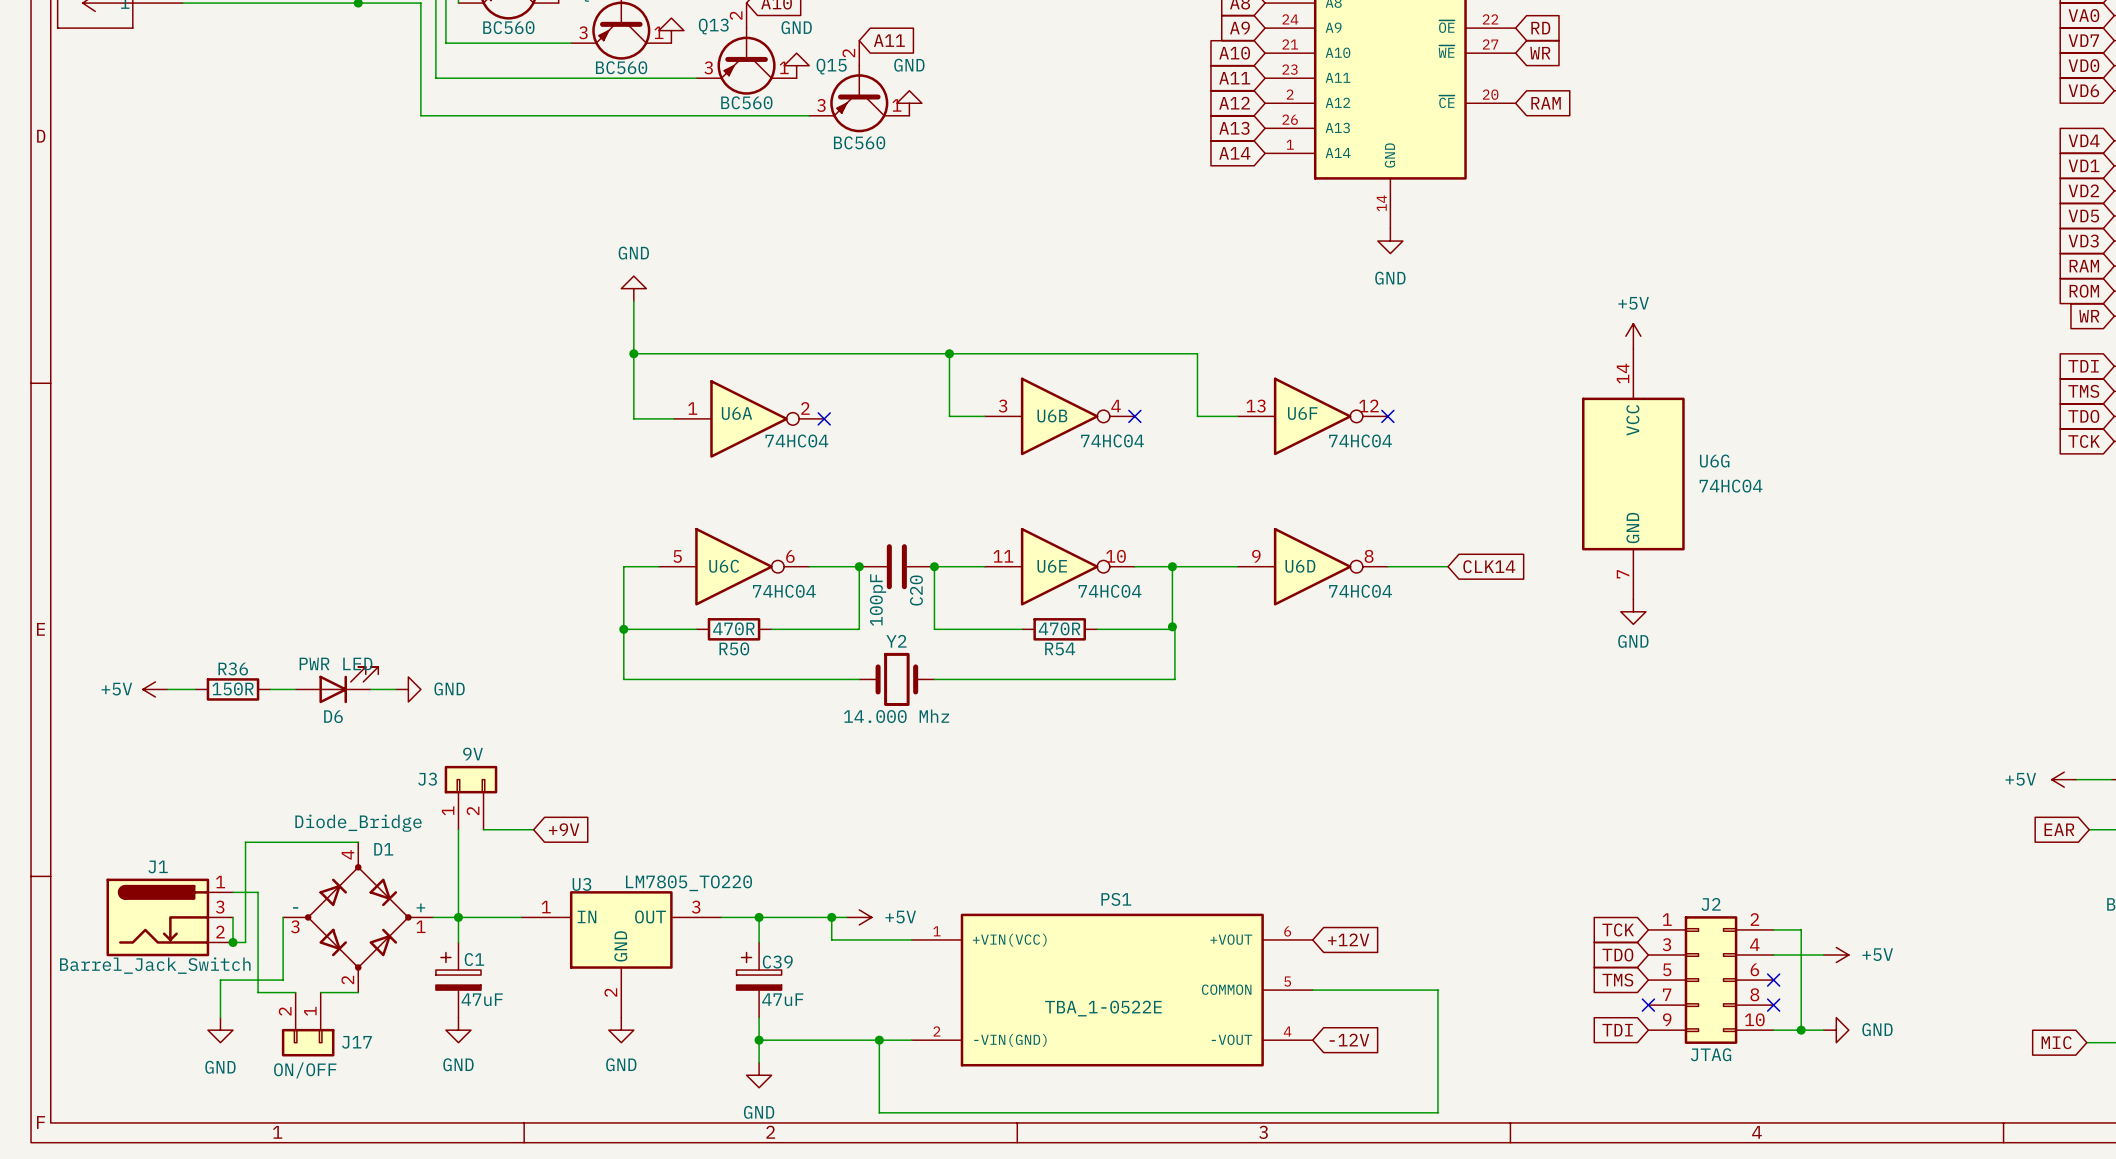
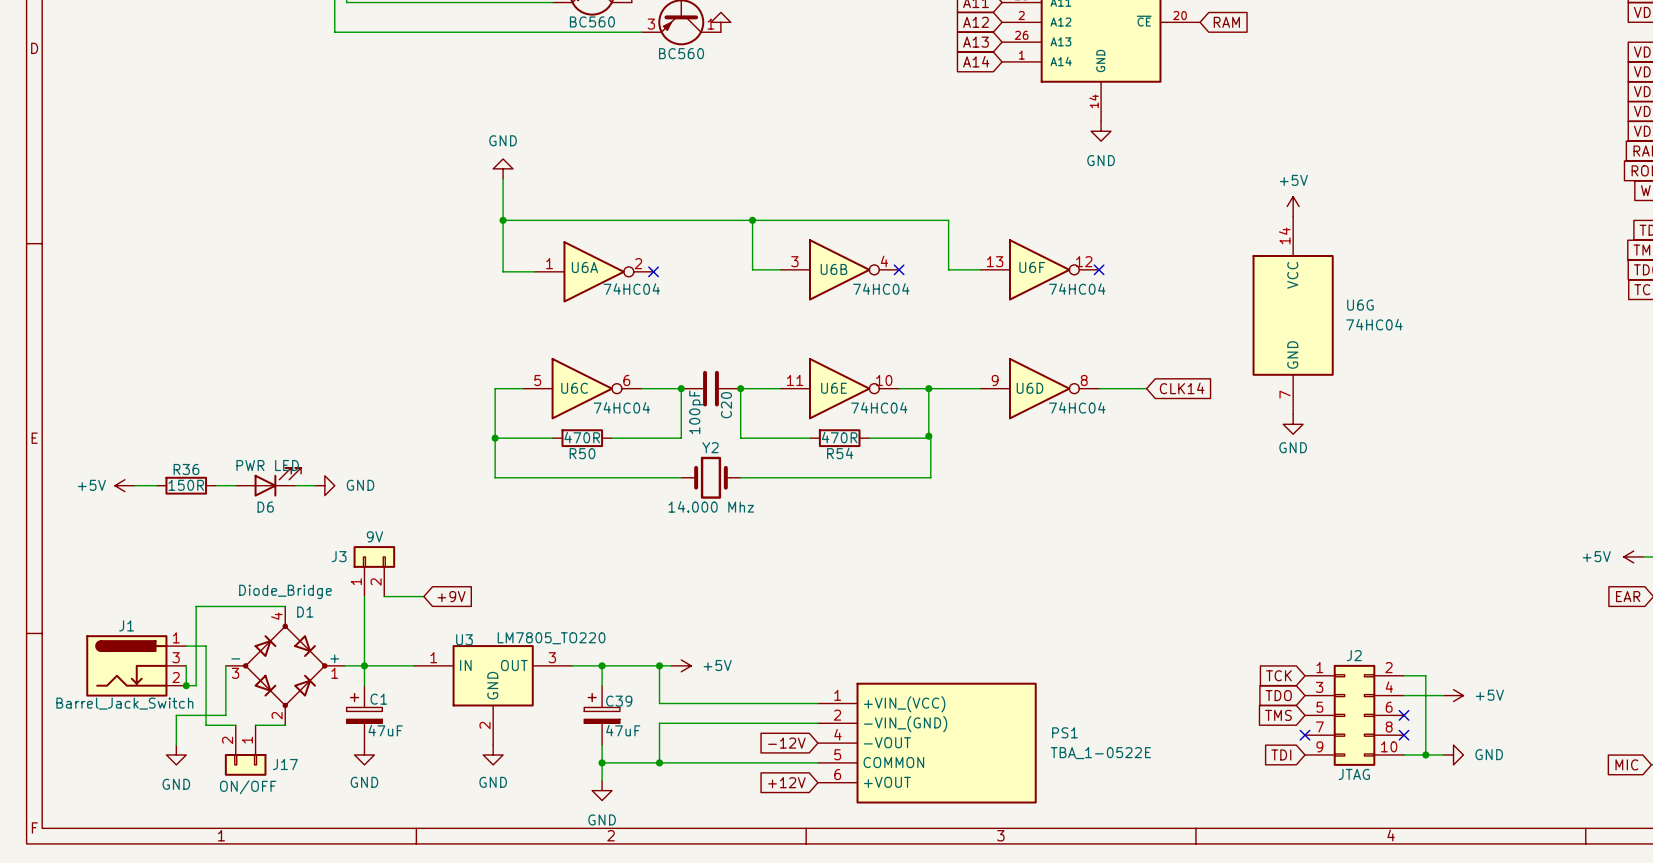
PS1 name position: PS1 (1116, 899) -> PS1 (1064, 732)
PS1 symbol: [911, 913, 1313, 1067] -> [817, 682, 1037, 804]
wire: (831, 939) (911, 939) -> (659, 683) (659, 703) (817, 703)
global label: +12V (1348, 939) -> none
wire: none -> (817, 723) (659, 723) (659, 762)
wire: (1312, 990) (1437, 990) (1437, 1112) (879, 1112) (879, 1040) -> none
PS1 value position: TBA_1-0522E (1103, 1008) -> TBA_1-0522E (1100, 753)
global label: none -> -12V (786, 743)
junction position: (879, 1040) -> (659, 762)
global label: -12V (1349, 1040) -> none
global label: none -> +12V (786, 782)

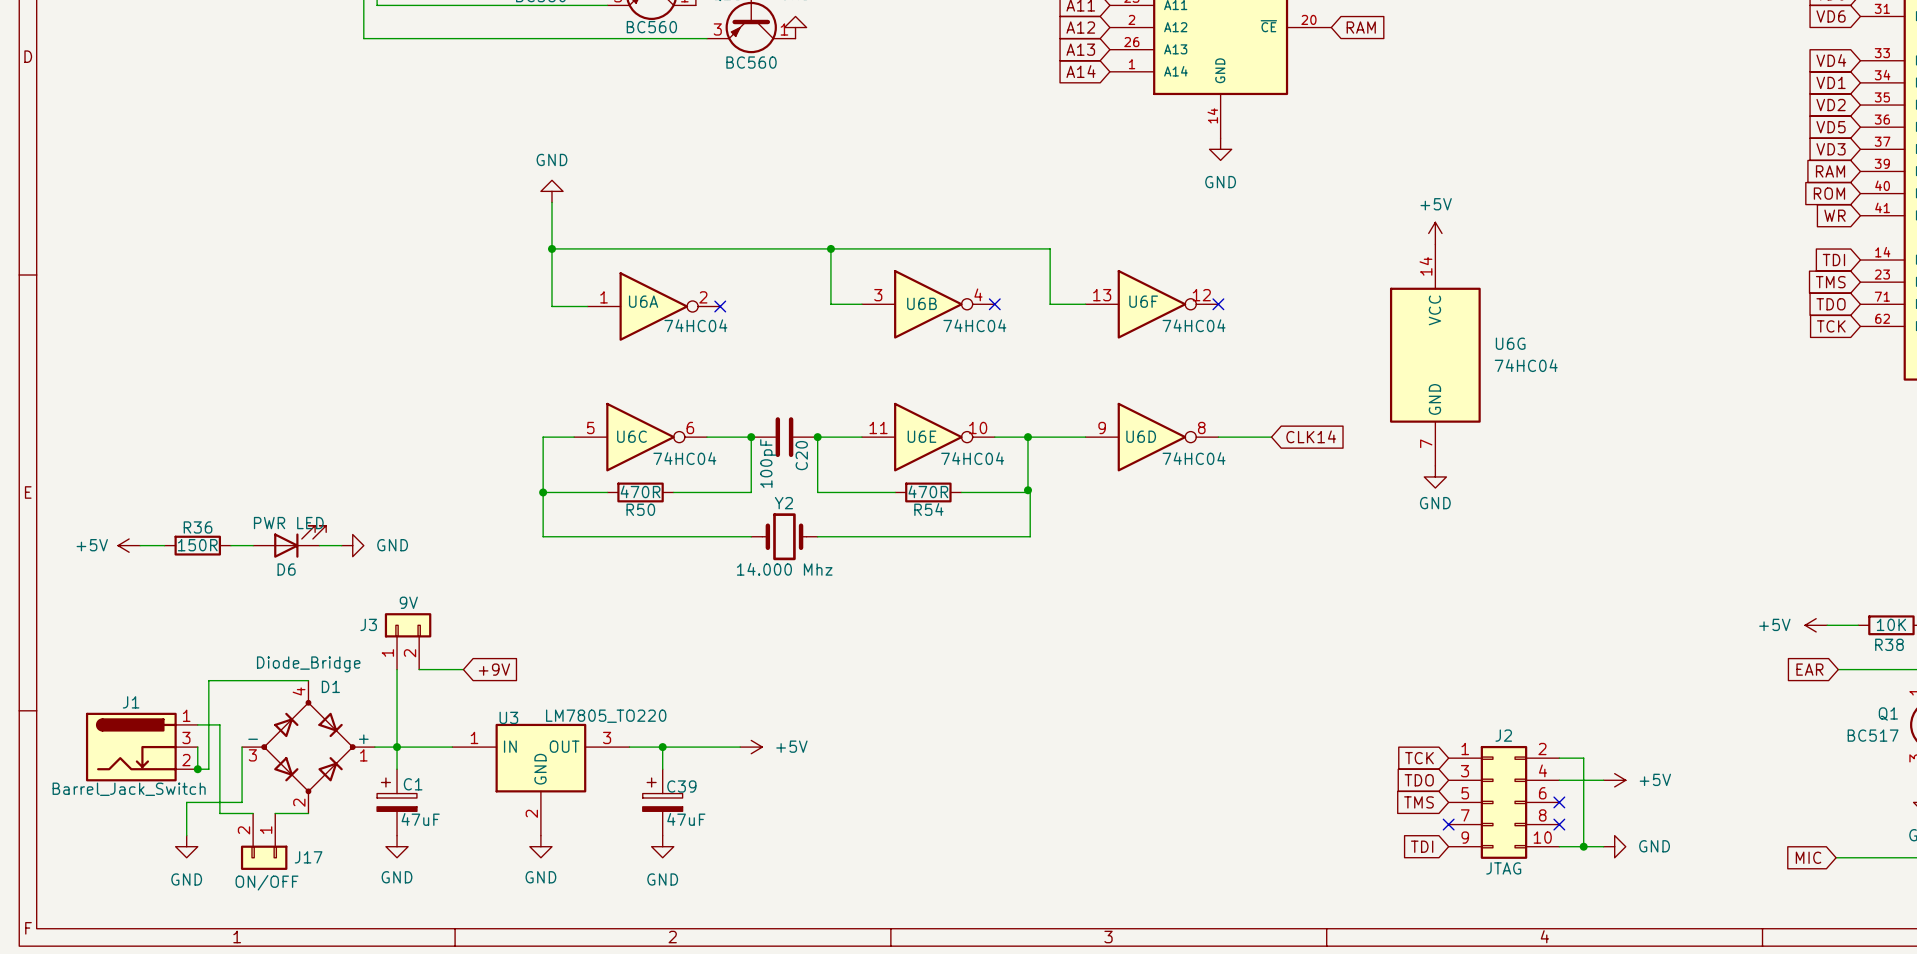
wire: (659, 665) (659, 703) (817, 703) -> none
junction: (659, 665) -> none
wire: (817, 723) (659, 723) (659, 762) -> none
global label: -12V (786, 743) -> none
PS1: TBA_1-0522E (927, 743) -> none
wire: (602, 745) (602, 780) -> none
wire: (602, 762) (817, 762) -> none
junction: (602, 762) -> none
junction: (659, 762) -> none
global label: +12V (786, 782) -> none
power symbol position: GND (602, 790) -> GND (662, 846)

